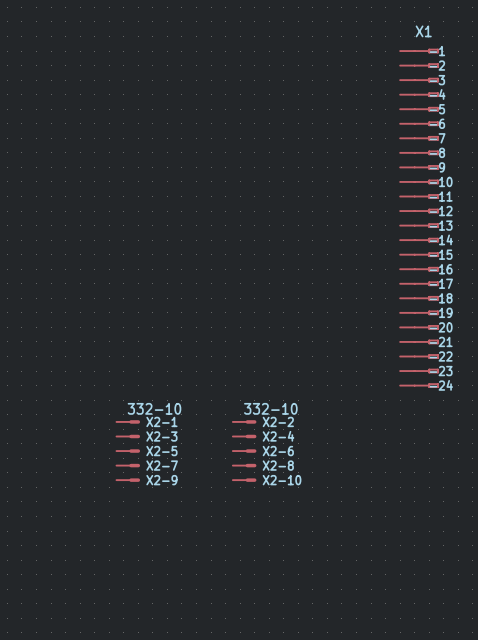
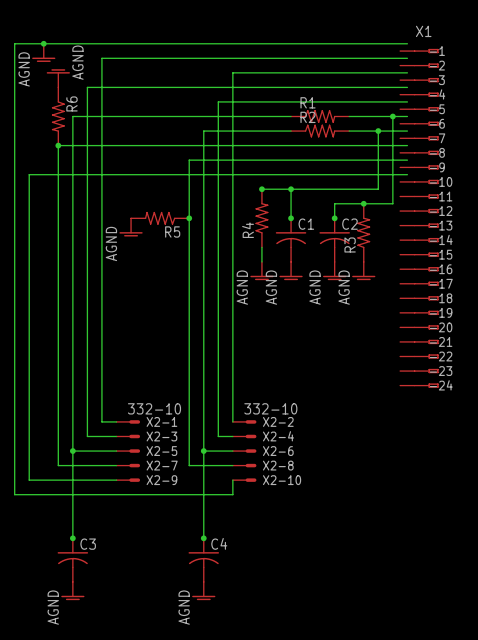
junction: none -> (43, 43)
wire: none -> (407, 43) (14, 43) (14, 494) (232, 494) (232, 480)
power symbol: none -> AGND (43, 52)
wire: none -> (407, 58) (101, 58) (101, 421) (116, 421)
wire: none -> (407, 72) (232, 72) (232, 421)
power symbol: none -> AGND (58, 78)
wire: none -> (407, 87) (87, 87) (87, 436) (116, 436)
wire: none -> (407, 101) (218, 101) (218, 436) (232, 436)
R6: none -> (58, 116)
wire: none -> (291, 116) (72, 116) (72, 538)
R1: none -> (320, 116)
wire: none -> (349, 116) (407, 116)
wire: none -> (392, 116) (392, 203) (334, 203) (334, 218)
junction: none -> (392, 116)
wire: none -> (291, 131) (203, 131) (203, 538)
R2: none -> (320, 131)
wire: none -> (349, 131) (407, 131)
wire: none -> (378, 131) (378, 189) (261, 189)
junction: none -> (378, 131)
junction: none -> (58, 145)
wire: none -> (407, 145) (58, 145) (58, 465) (116, 465)
wire: none -> (407, 160) (189, 160) (189, 465) (232, 465)
wire: none -> (407, 174) (29, 174) (29, 480) (116, 480)
junction: none -> (261, 189)
wire: none -> (291, 189) (291, 218)
junction: none -> (291, 189)
junction: none -> (363, 203)
R5: none -> (160, 218)
junction: none -> (189, 218)
R4: none -> (261, 218)
junction: none -> (291, 218)
junction: none -> (334, 218)
power symbol: none -> AGND (131, 227)
R3: none -> (363, 232)
C1: none -> (291, 240)
C2: none -> (334, 240)
wire: none -> (261, 247) (261, 261)
power symbol: none -> AGND (261, 271)
power symbol: none -> AGND (291, 271)
power symbol: none -> AGND (334, 271)
power symbol: none -> AGND (363, 271)
wire: none -> (72, 451) (116, 451)
junction: none -> (72, 451)
wire: none -> (203, 451) (232, 451)
junction: none -> (203, 451)
junction: none -> (72, 538)
junction: none -> (203, 538)
C3: none -> (72, 560)
C4: none -> (203, 560)
power symbol: none -> AGND (72, 591)
power symbol: none -> AGND (203, 591)

